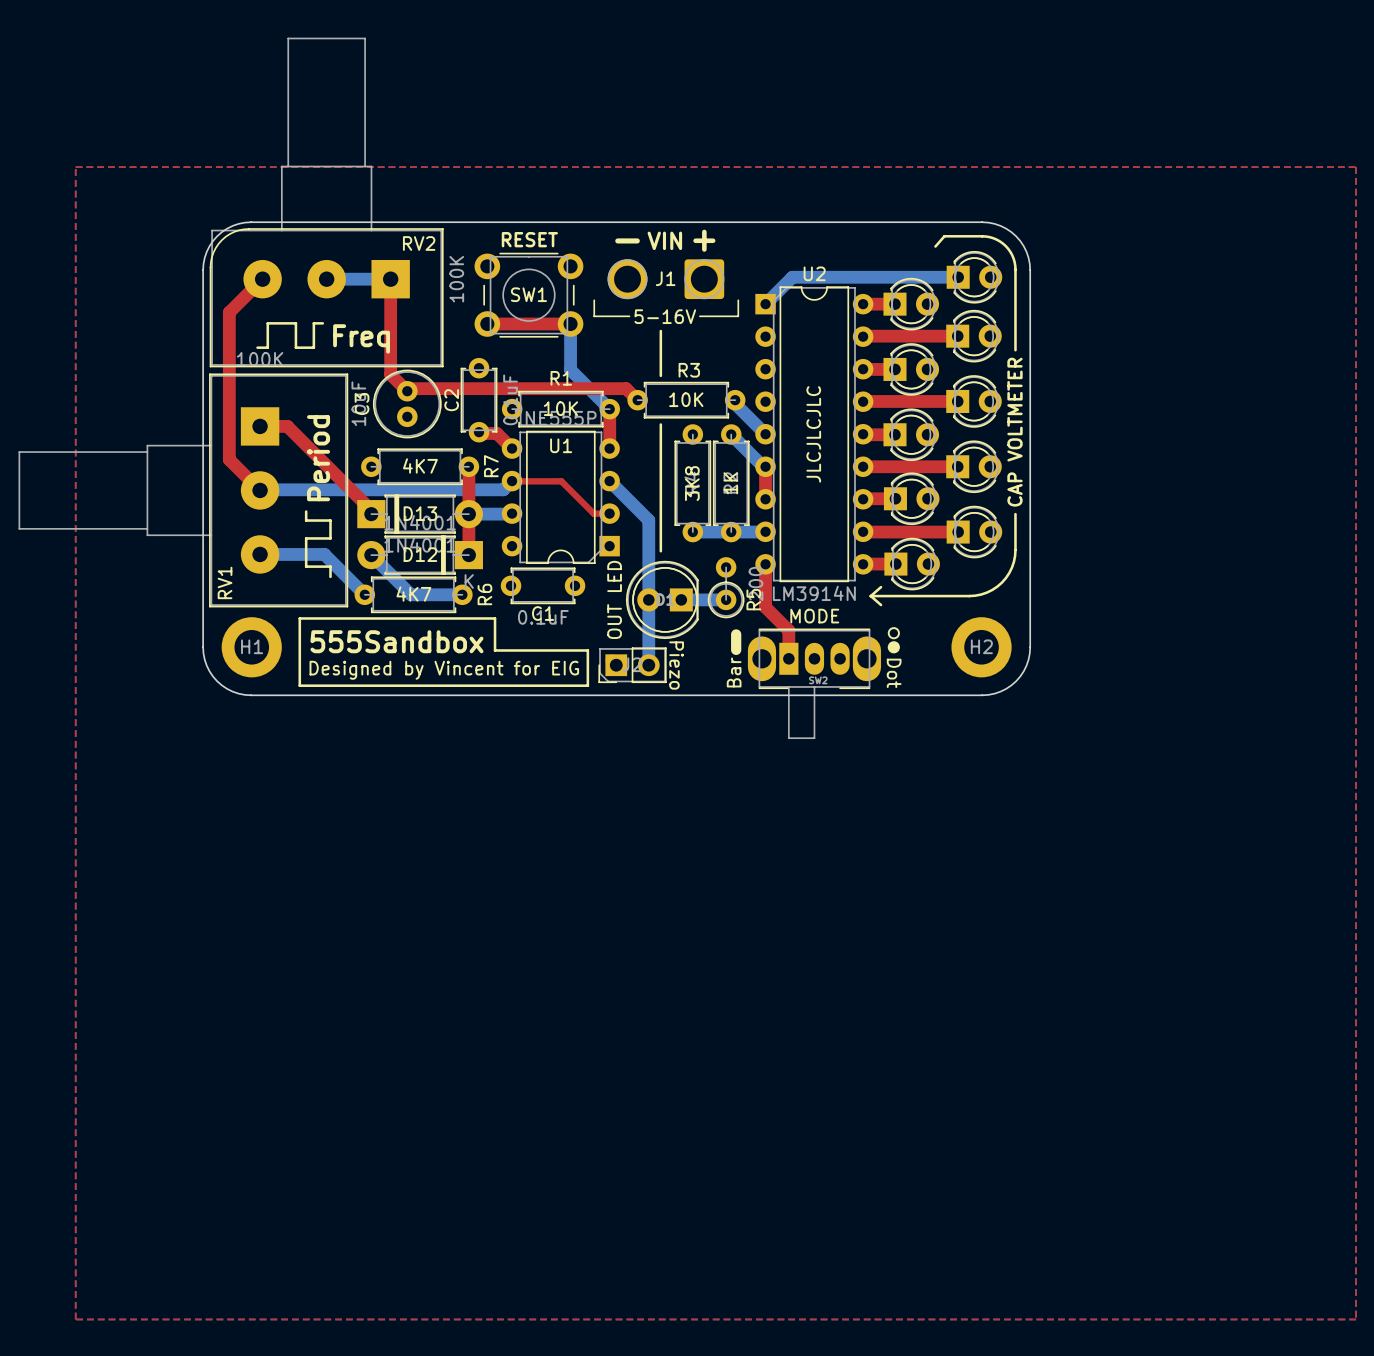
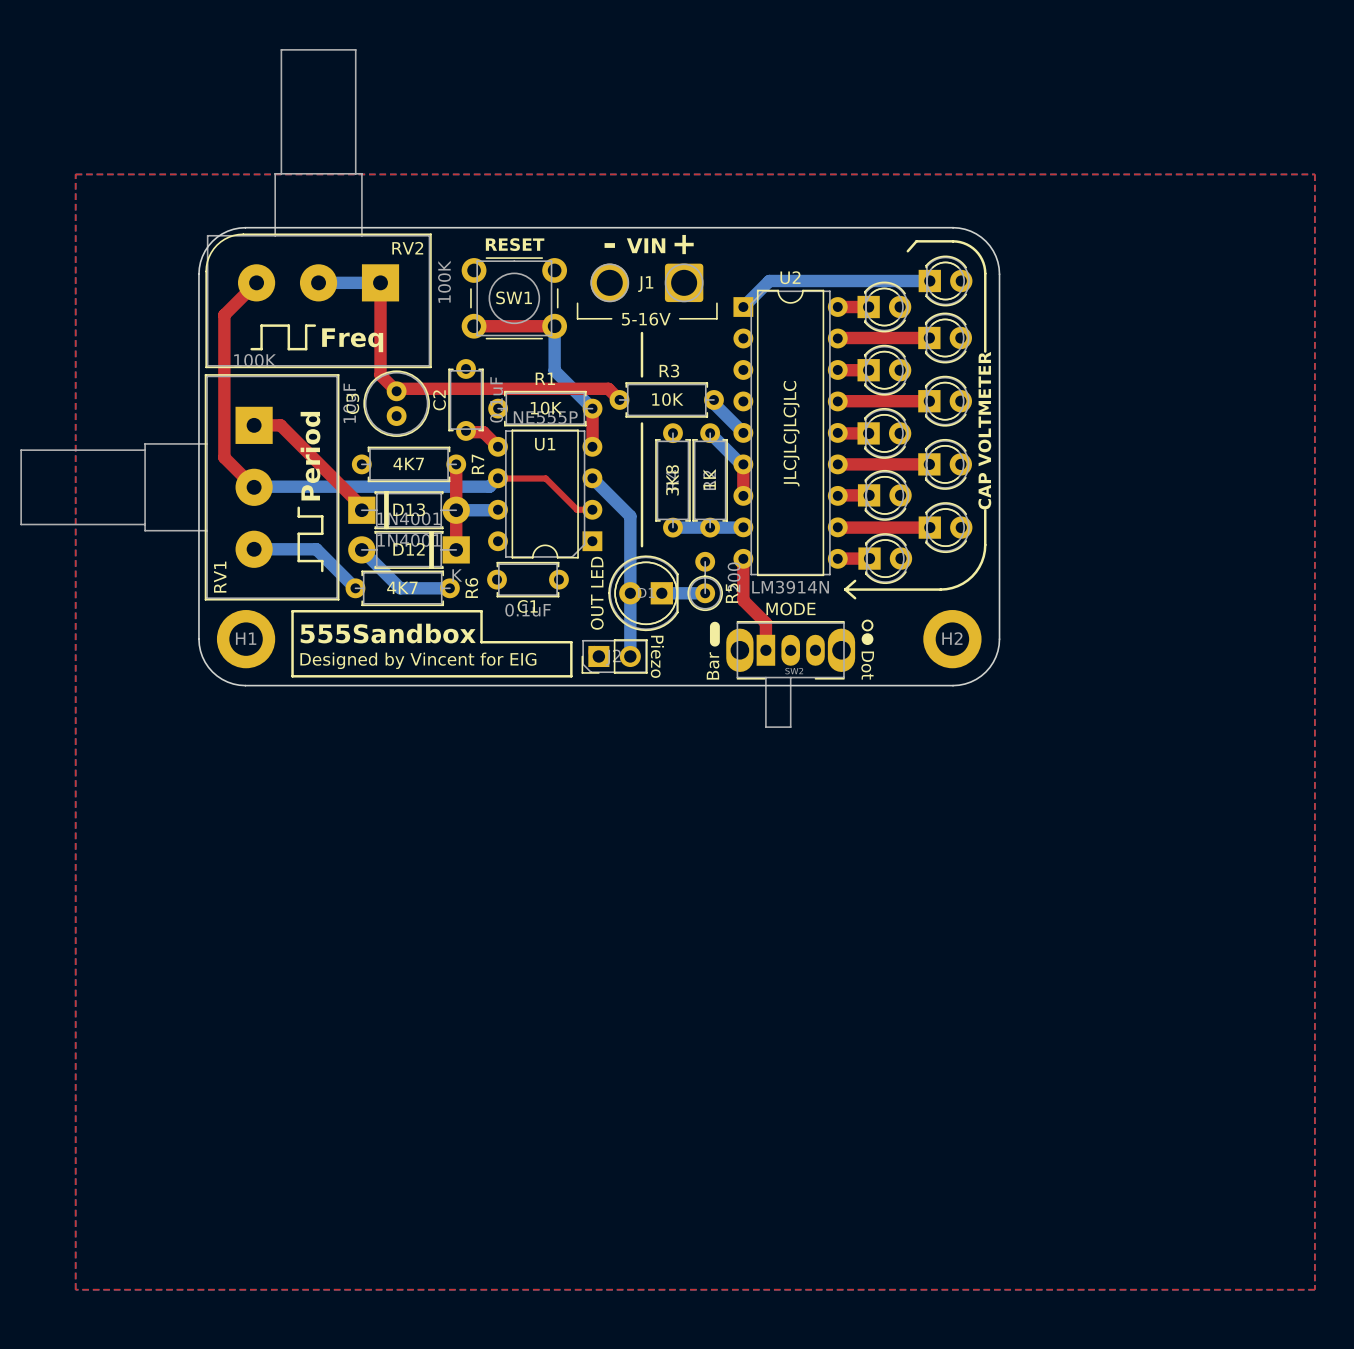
text: JLCJLCJLC (813, 434) -> JLCJLCJLCJLC (791, 433)

